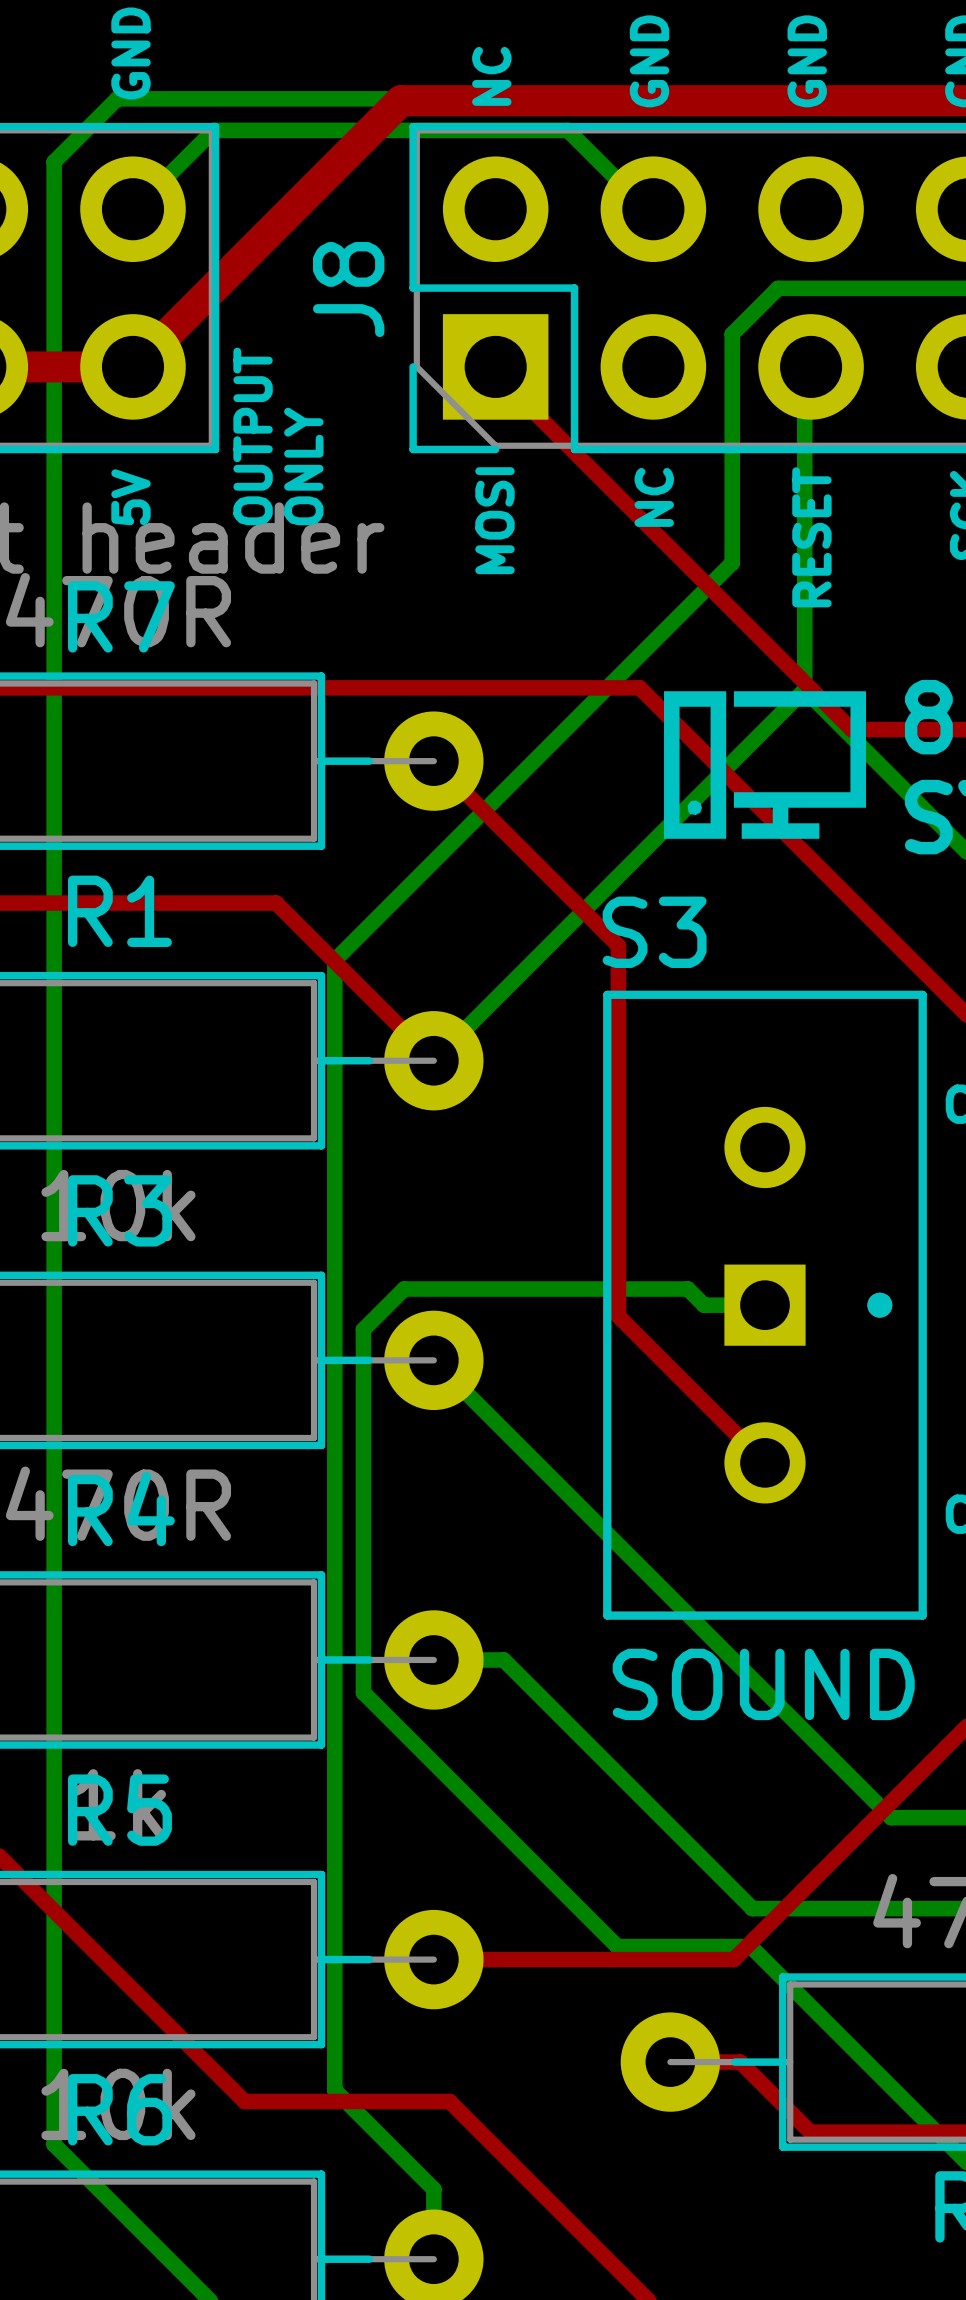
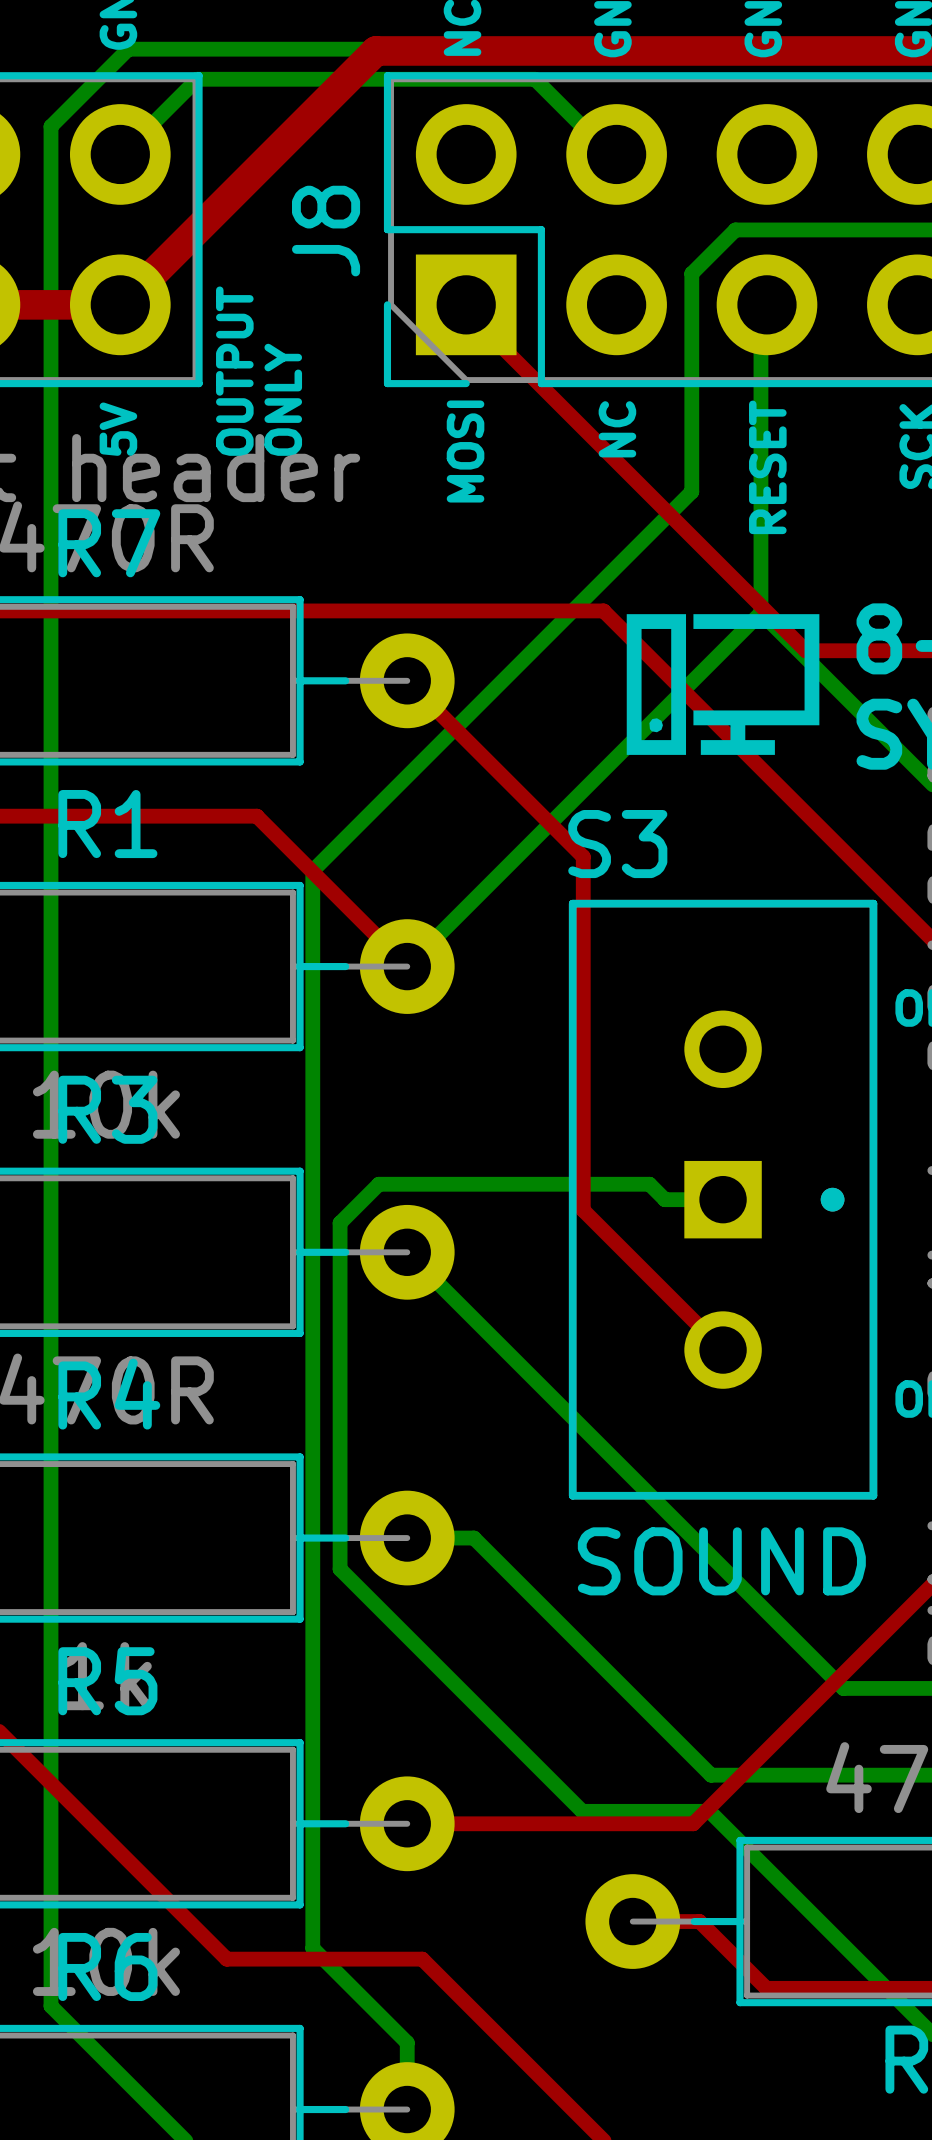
bottom track: (141, 98) (117, 98) (54, 161) (54, 2144) (60, 2150) -> (128, 49) (51, 126) (51, 2006)

